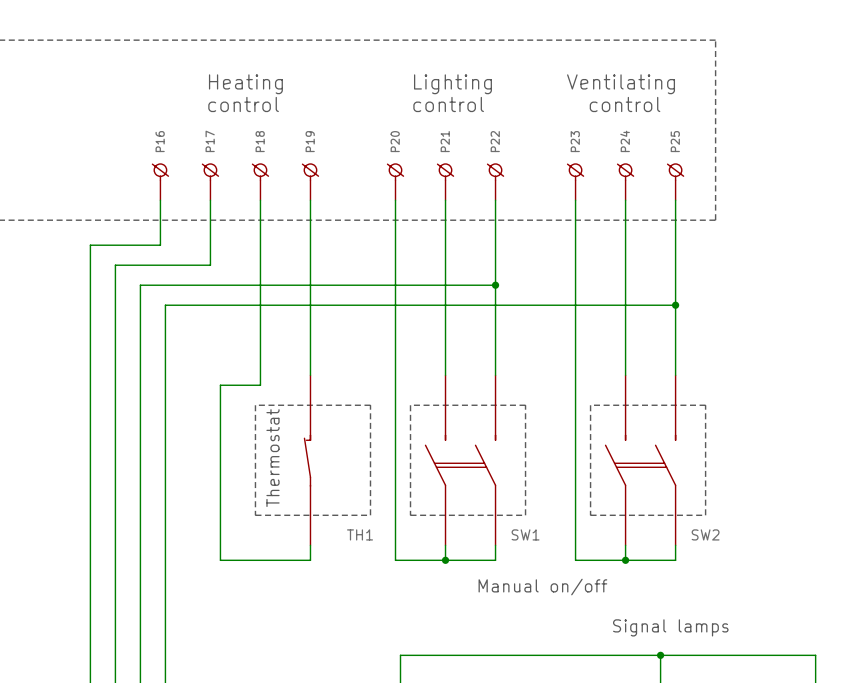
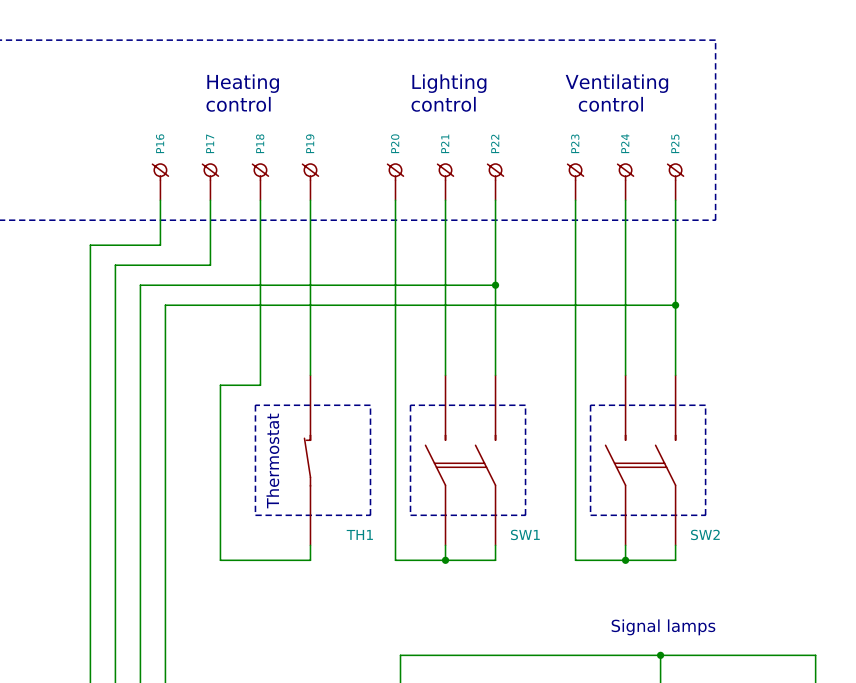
text: Manual on/off (542, 587) -> none

